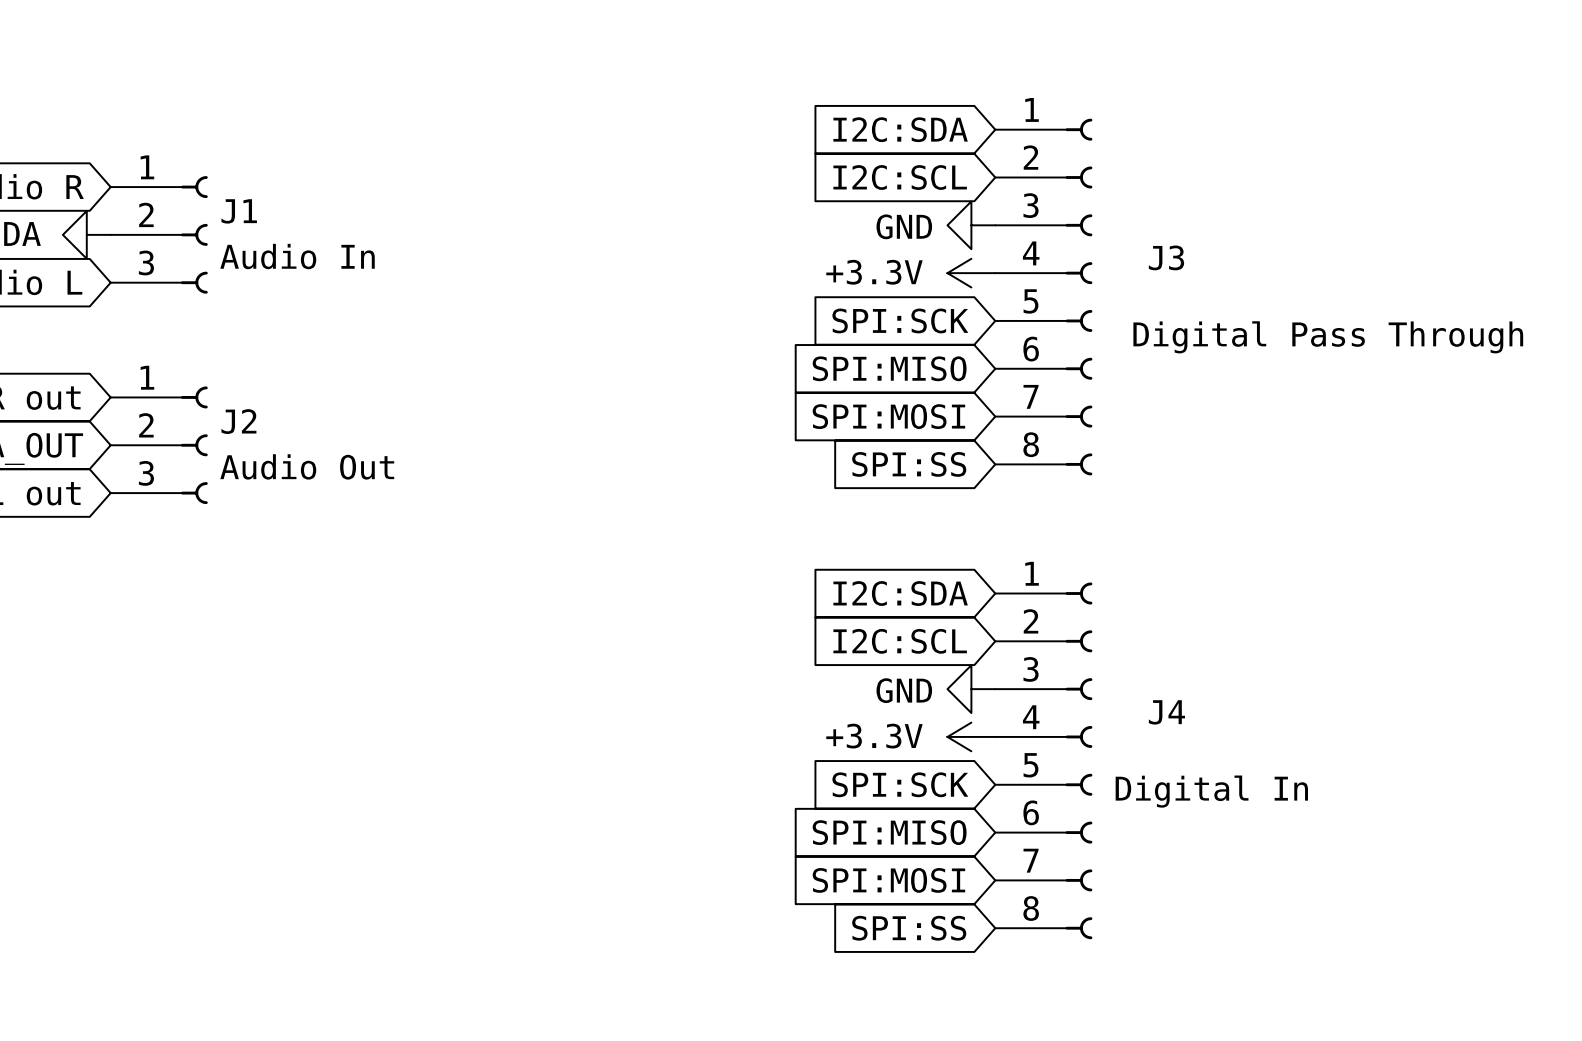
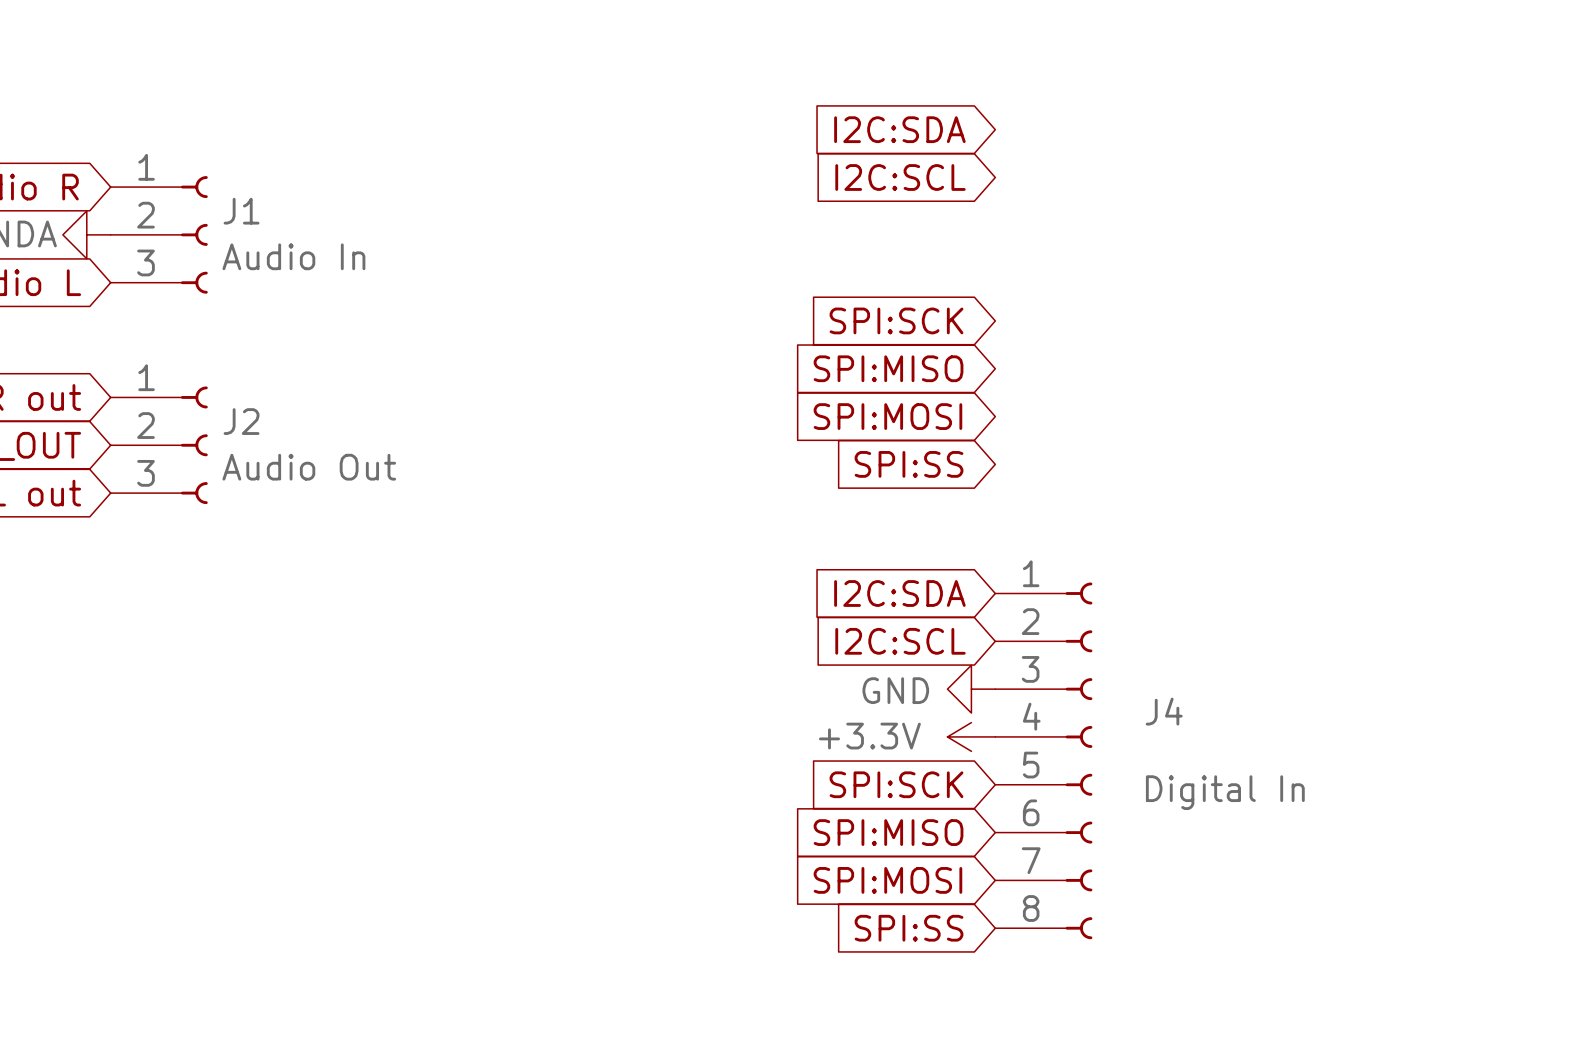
power symbol: GND (971, 225) -> none
power symbol: +3.3V (971, 273) -> none
J3: Digital Pass Through (1043, 297) -> none

